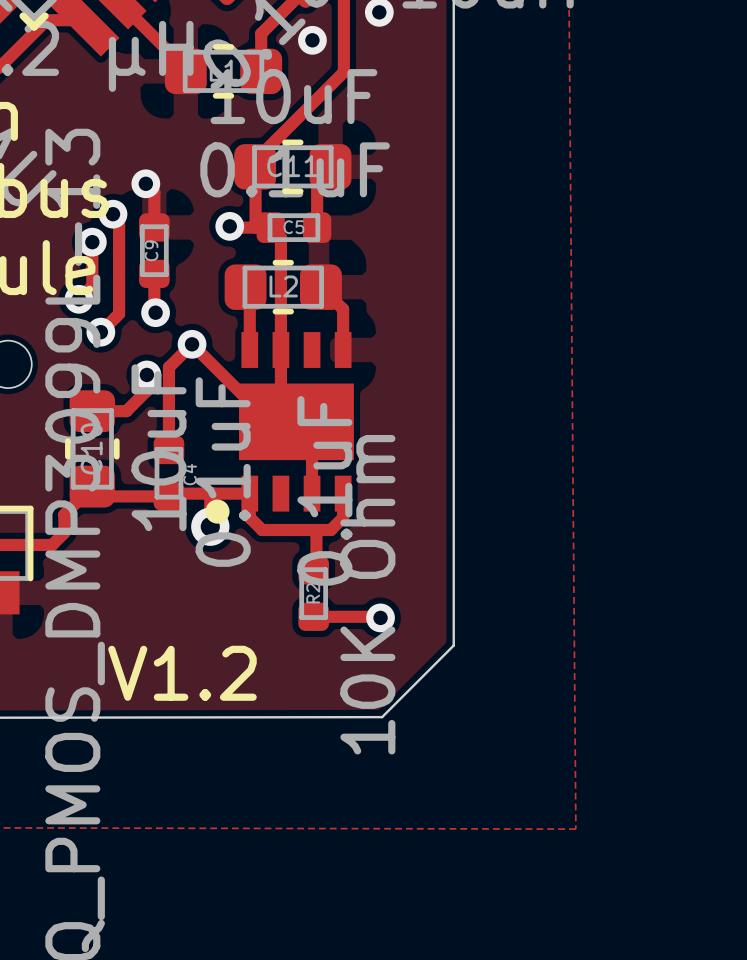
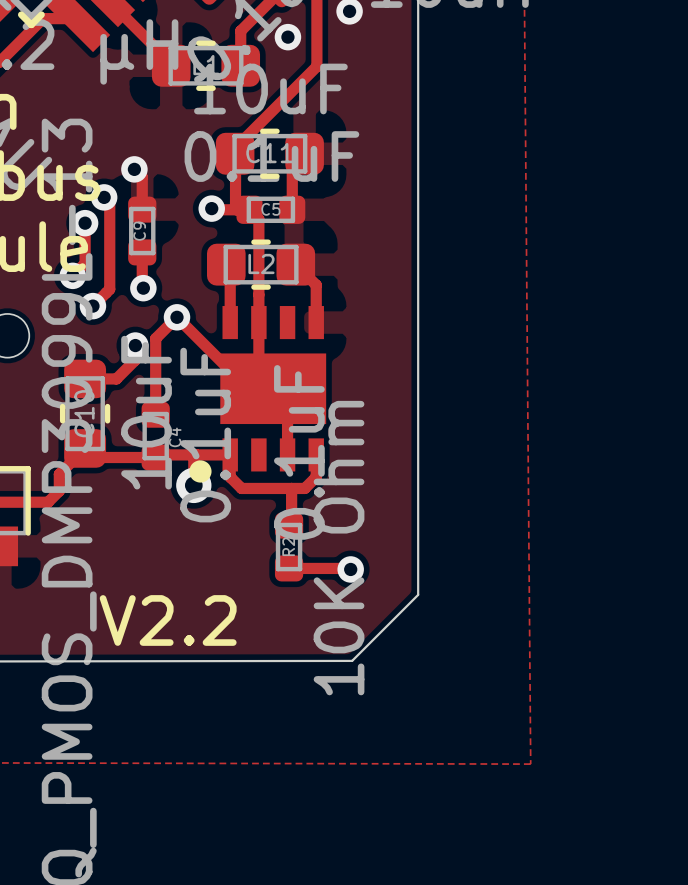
text: V1.2 (182, 673) -> V2.2 (168, 620)

